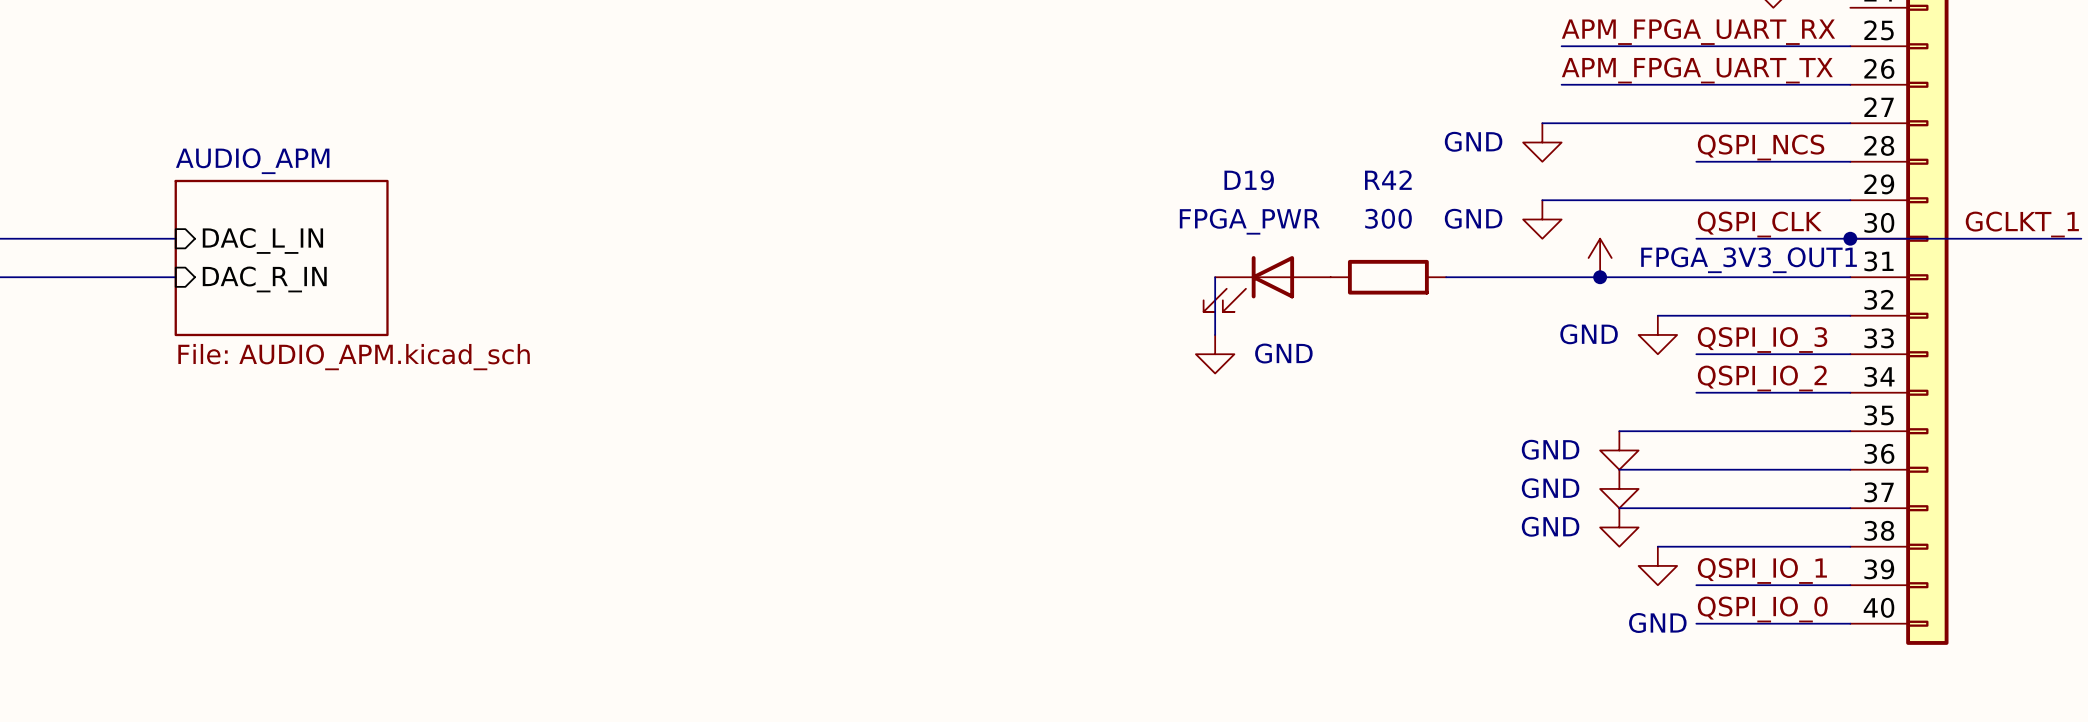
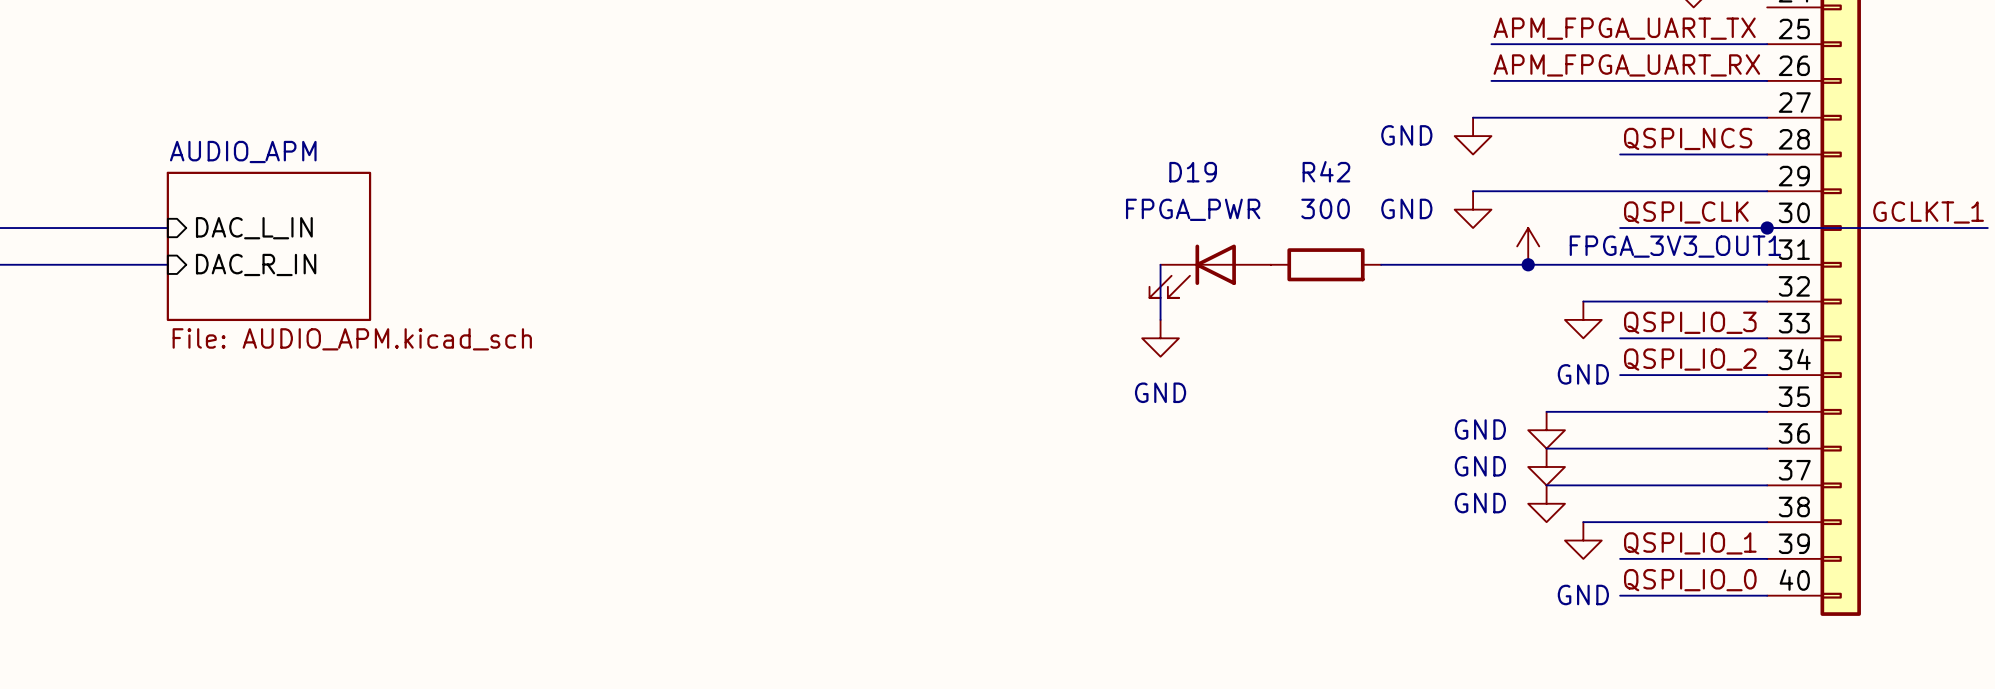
label: APM_FPGA_UART_RX (1698, 32) -> APM_FPGA_UART_TX (1624, 28)
label: APM_FPGA_UART_TX (1697, 70) -> APM_FPGA_UART_RX (1626, 65)
power symbol text position: GND (1589, 334) -> GND (1583, 374)
power symbol text position: GND (1283, 353) -> GND (1160, 392)

